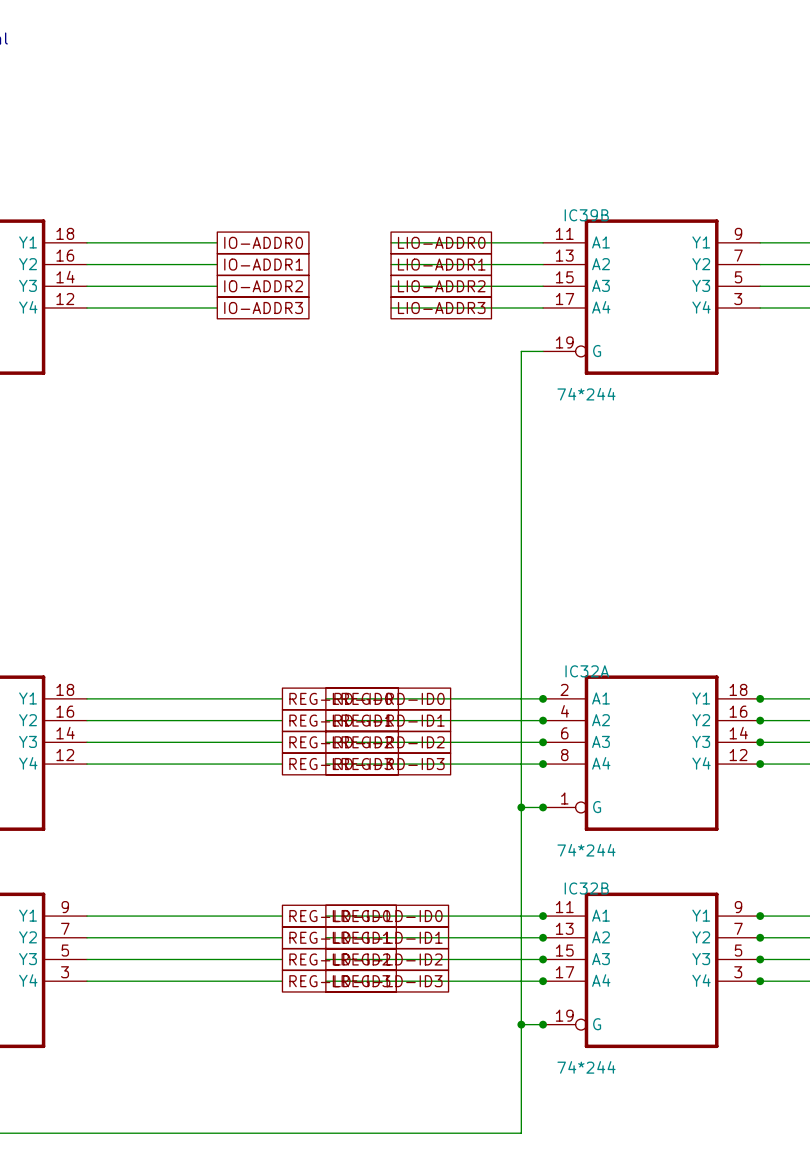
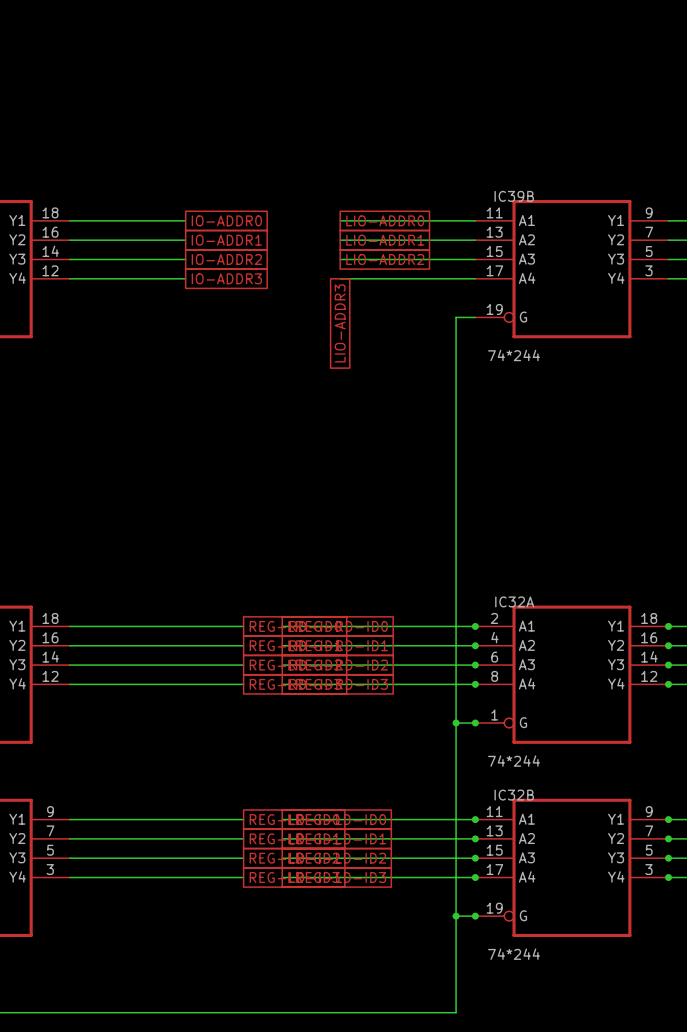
global label rotation: 0° (441, 307) -> 90° clockwise (340, 323)

